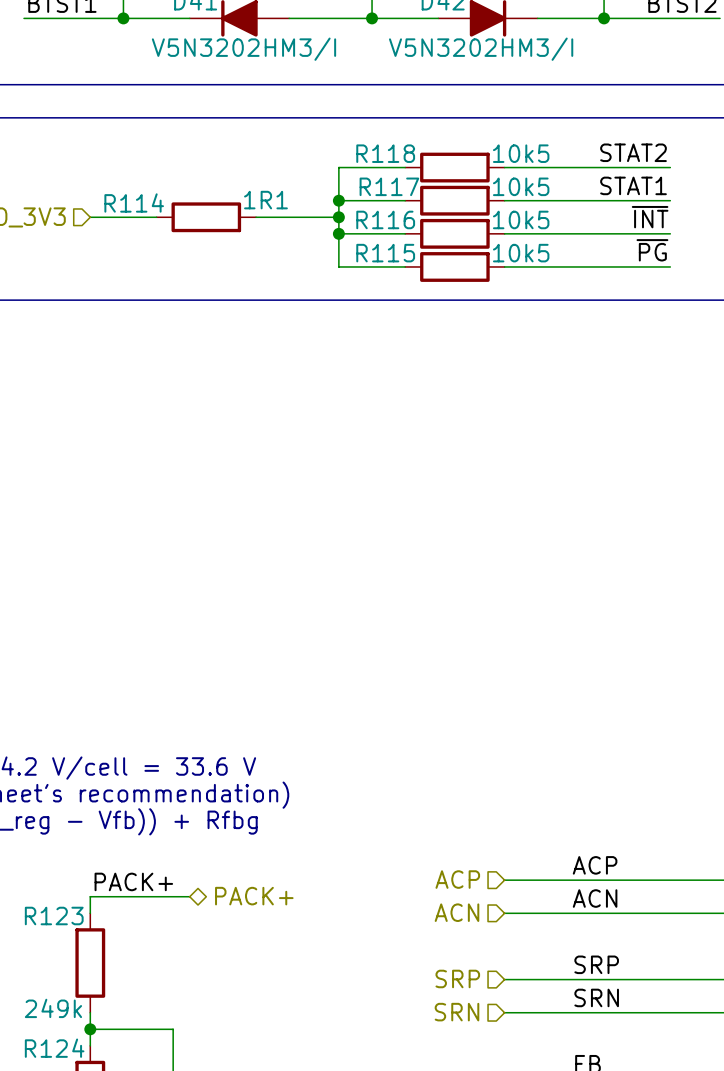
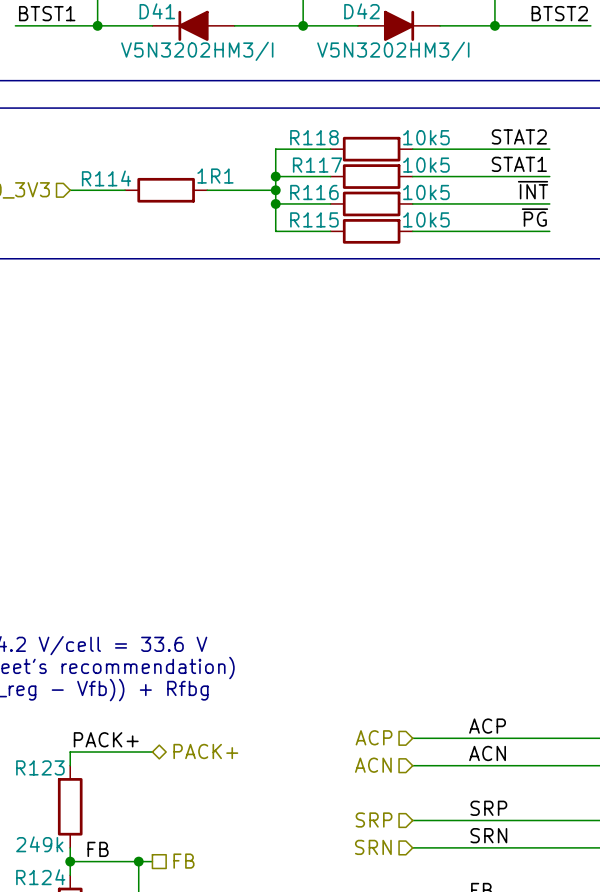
label: none -> FB (98, 849)
hierarchical label: none -> FB (183, 861)
wire: none -> (138, 861) (152, 861)
junction: none -> (138, 861)

